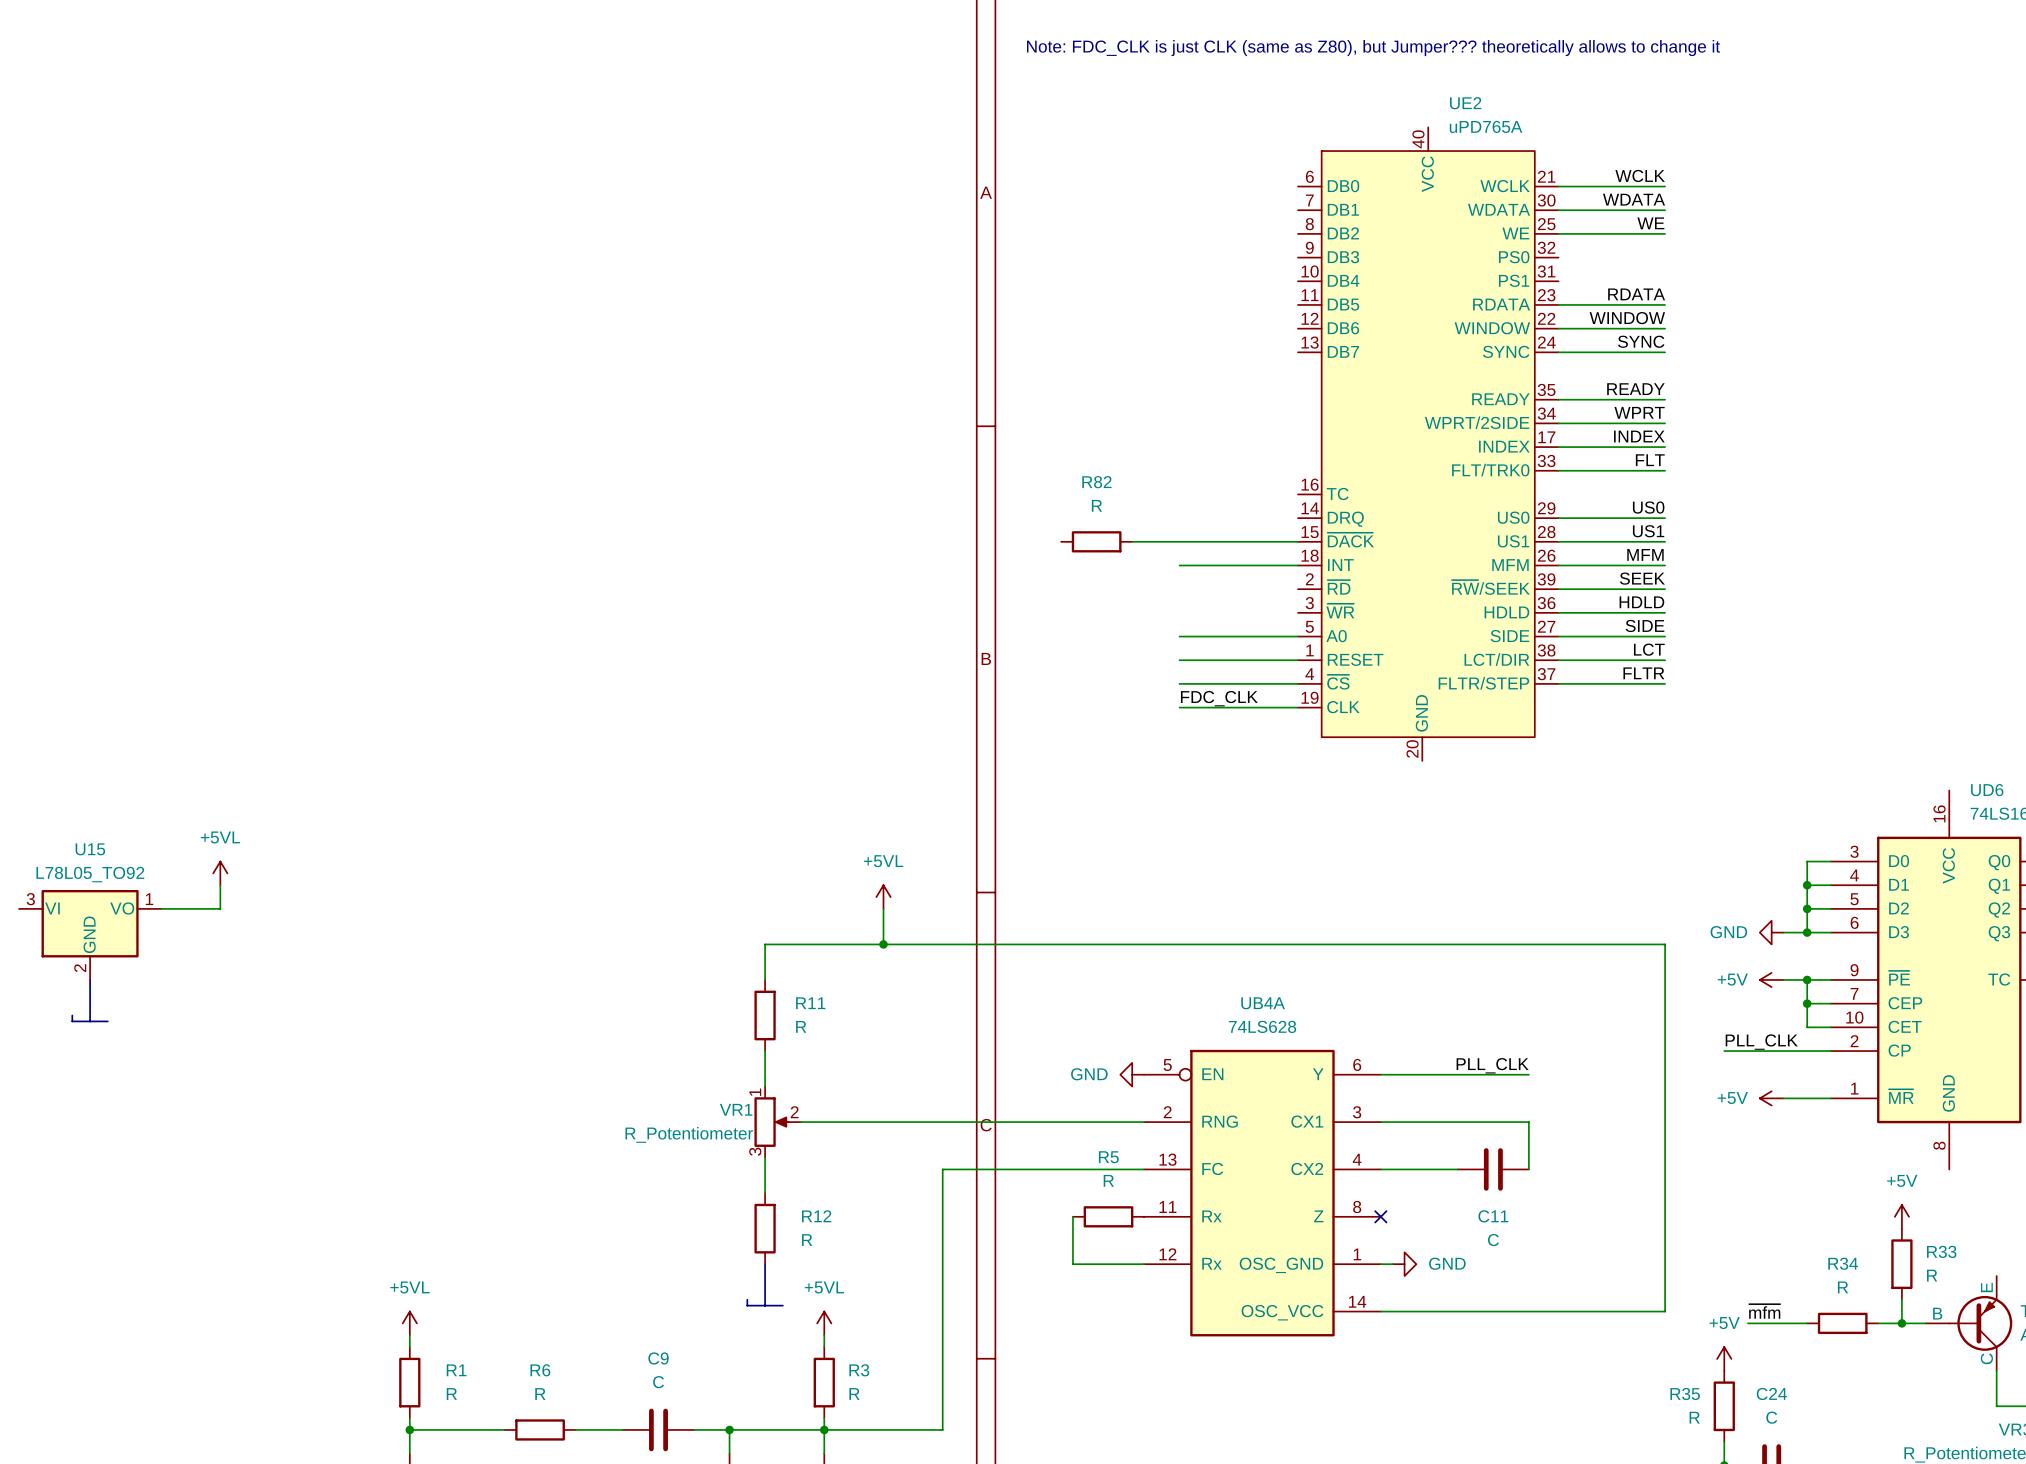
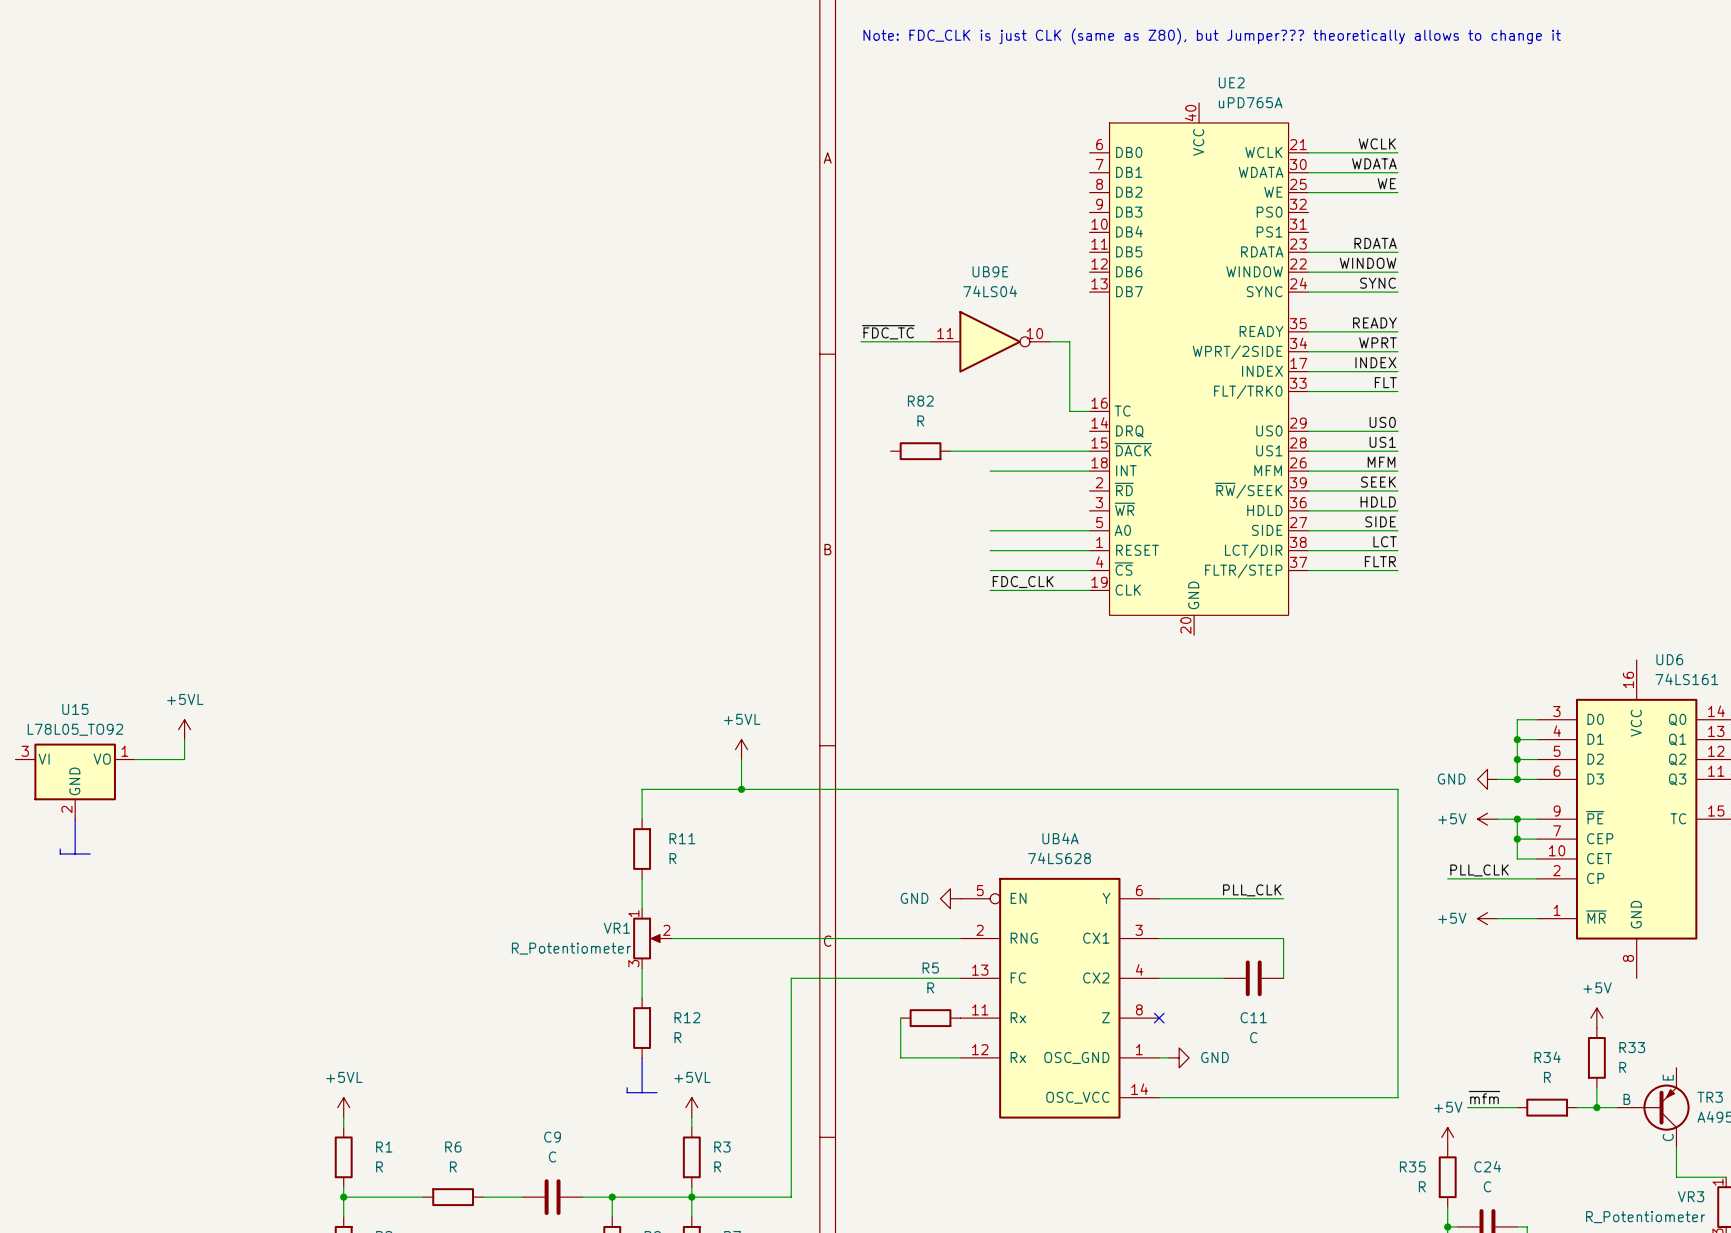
label: none -> ~{FDC_TC} (888, 332)
wire: none -> (860, 341) (930, 341)
UB9E: none -> 74LS04 (990, 341)
wire: none -> (1049, 341) (1069, 341) (1069, 411) (1089, 411)

